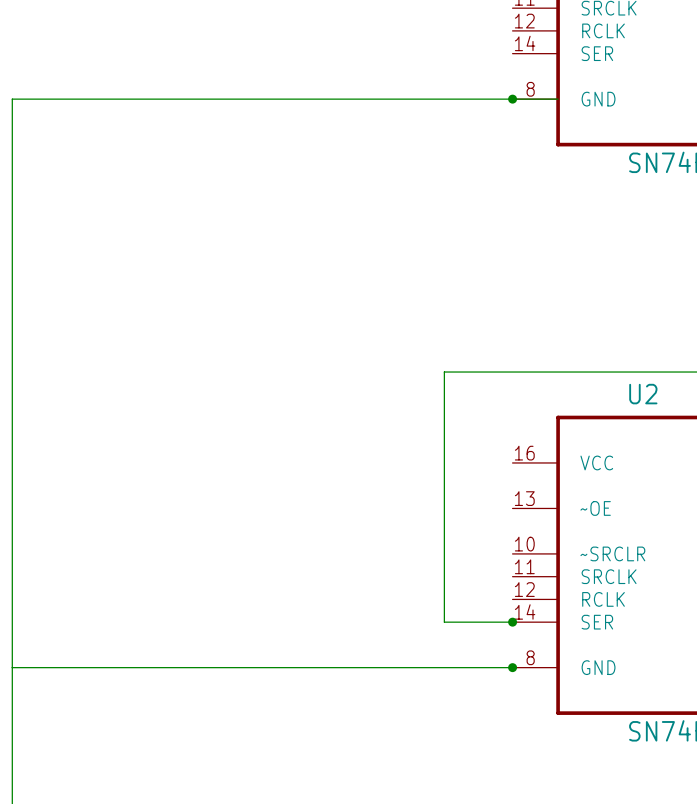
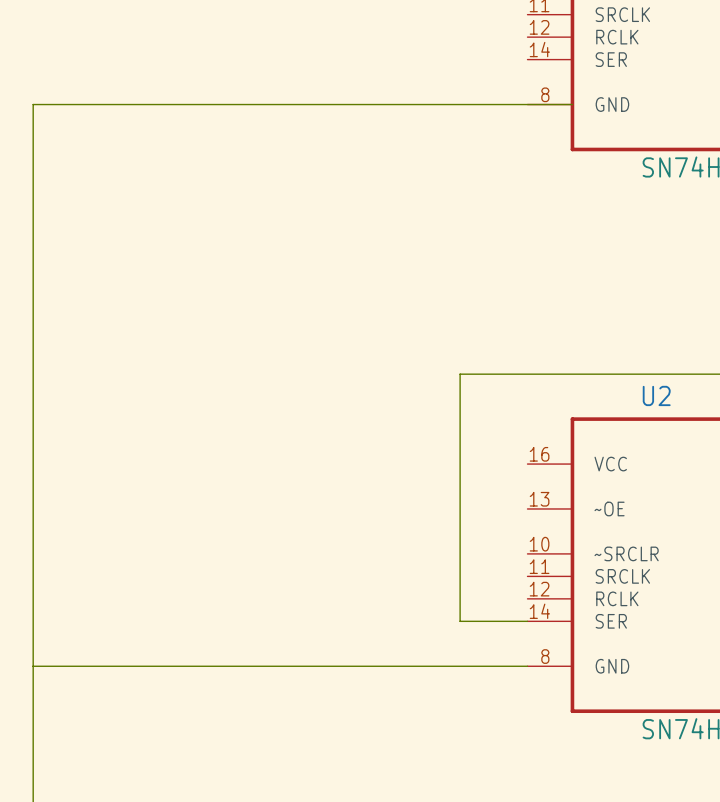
junction: (512, 99) -> none
junction: (512, 622) -> none
junction: (512, 667) -> none

